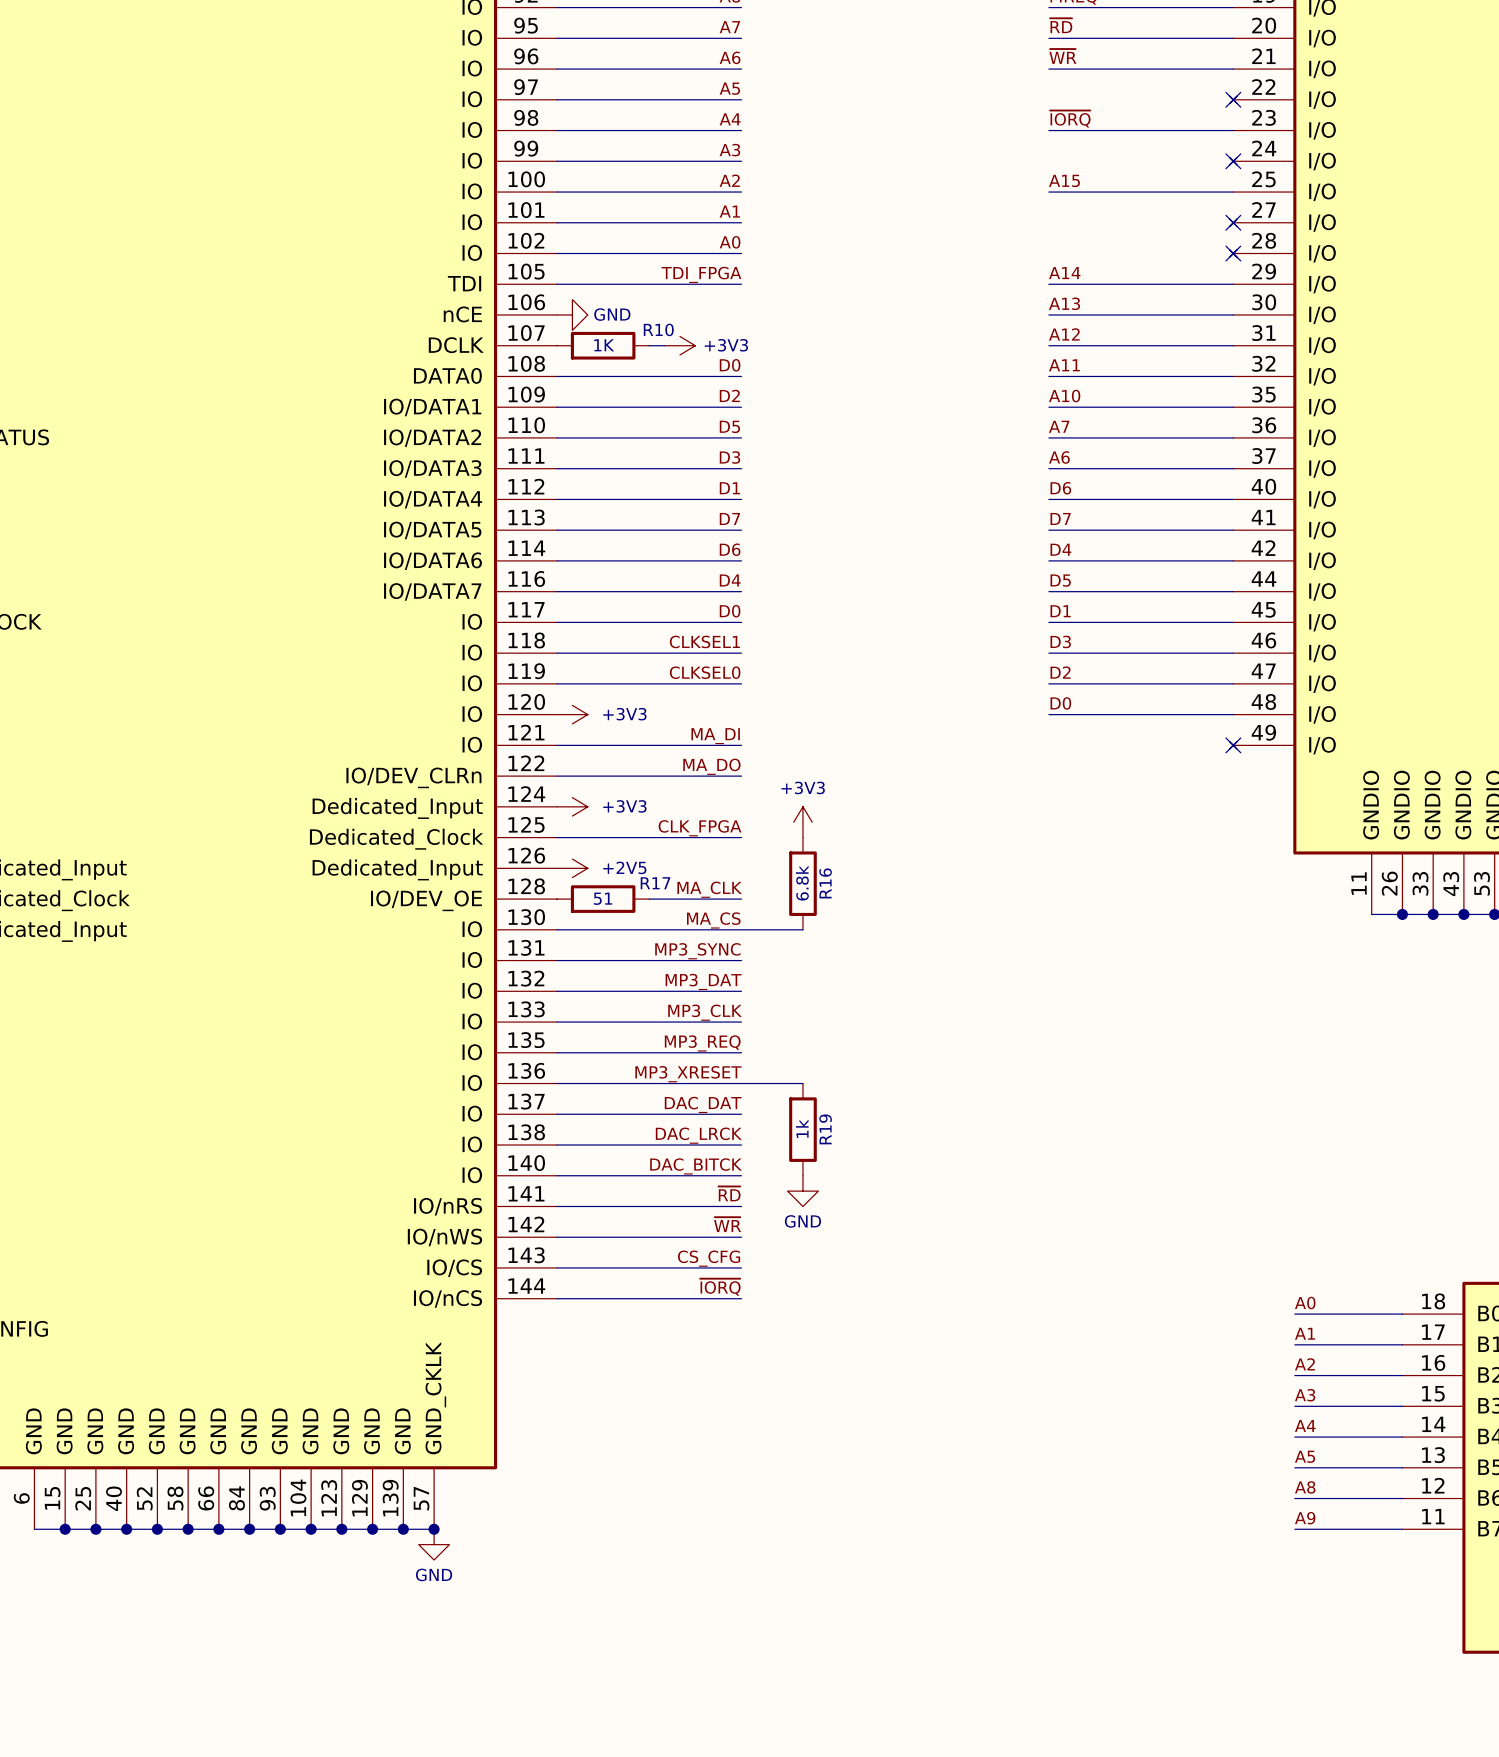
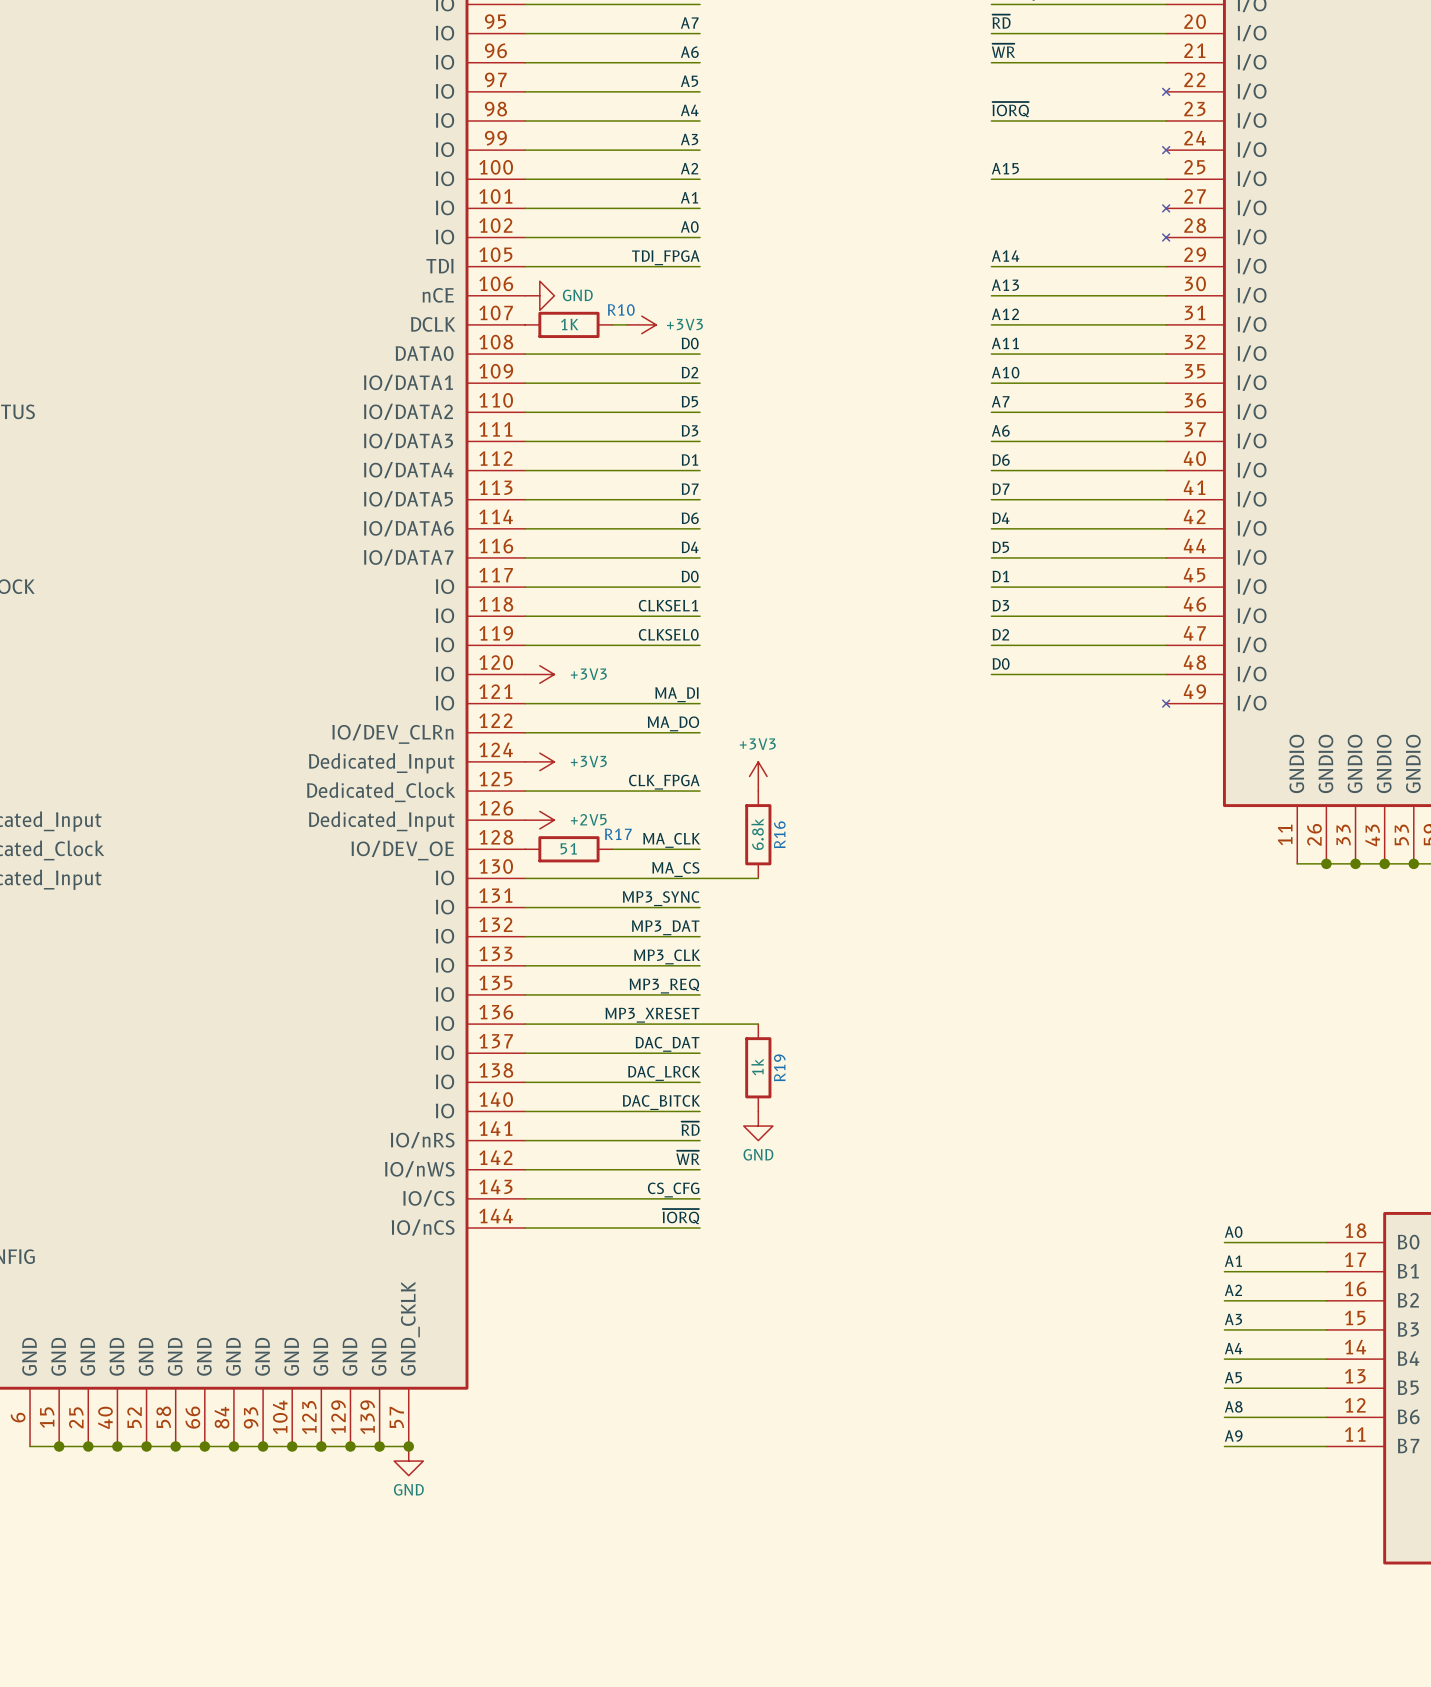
no-connect mark: (1233, 99) -> none
no-connect mark: (1233, 161) -> none
no-connect mark: (1233, 222) -> none
no-connect mark: (1233, 253) -> none
no-connect mark: (1233, 745) -> none

